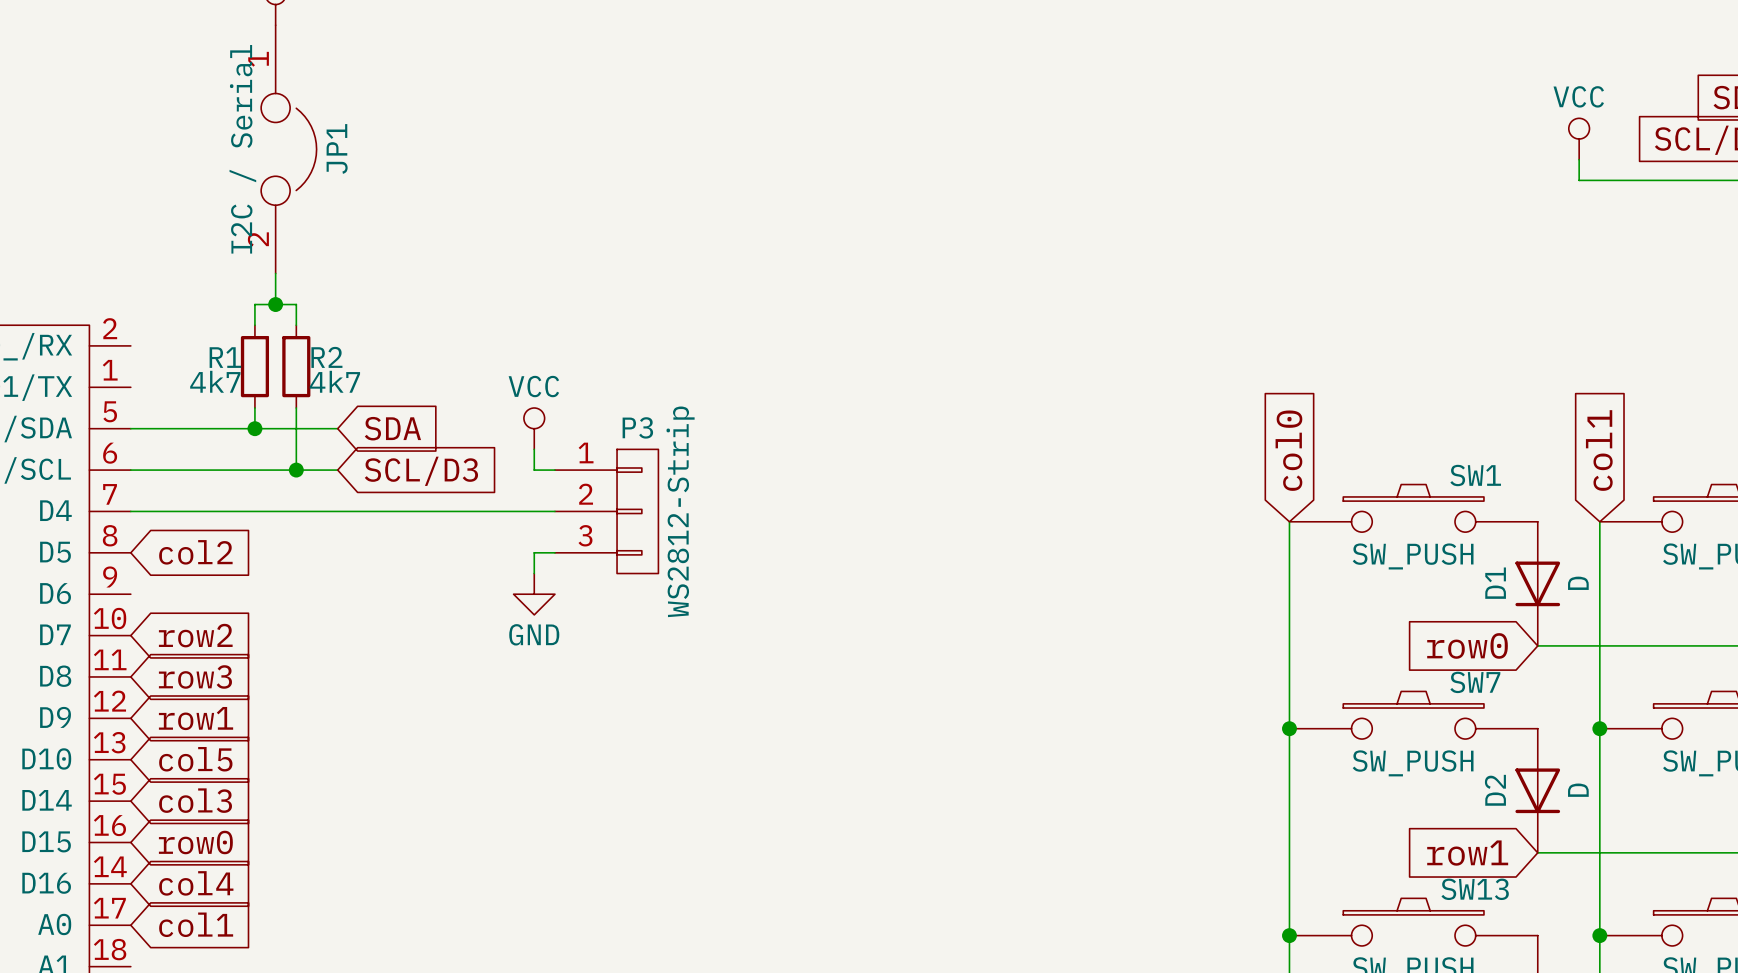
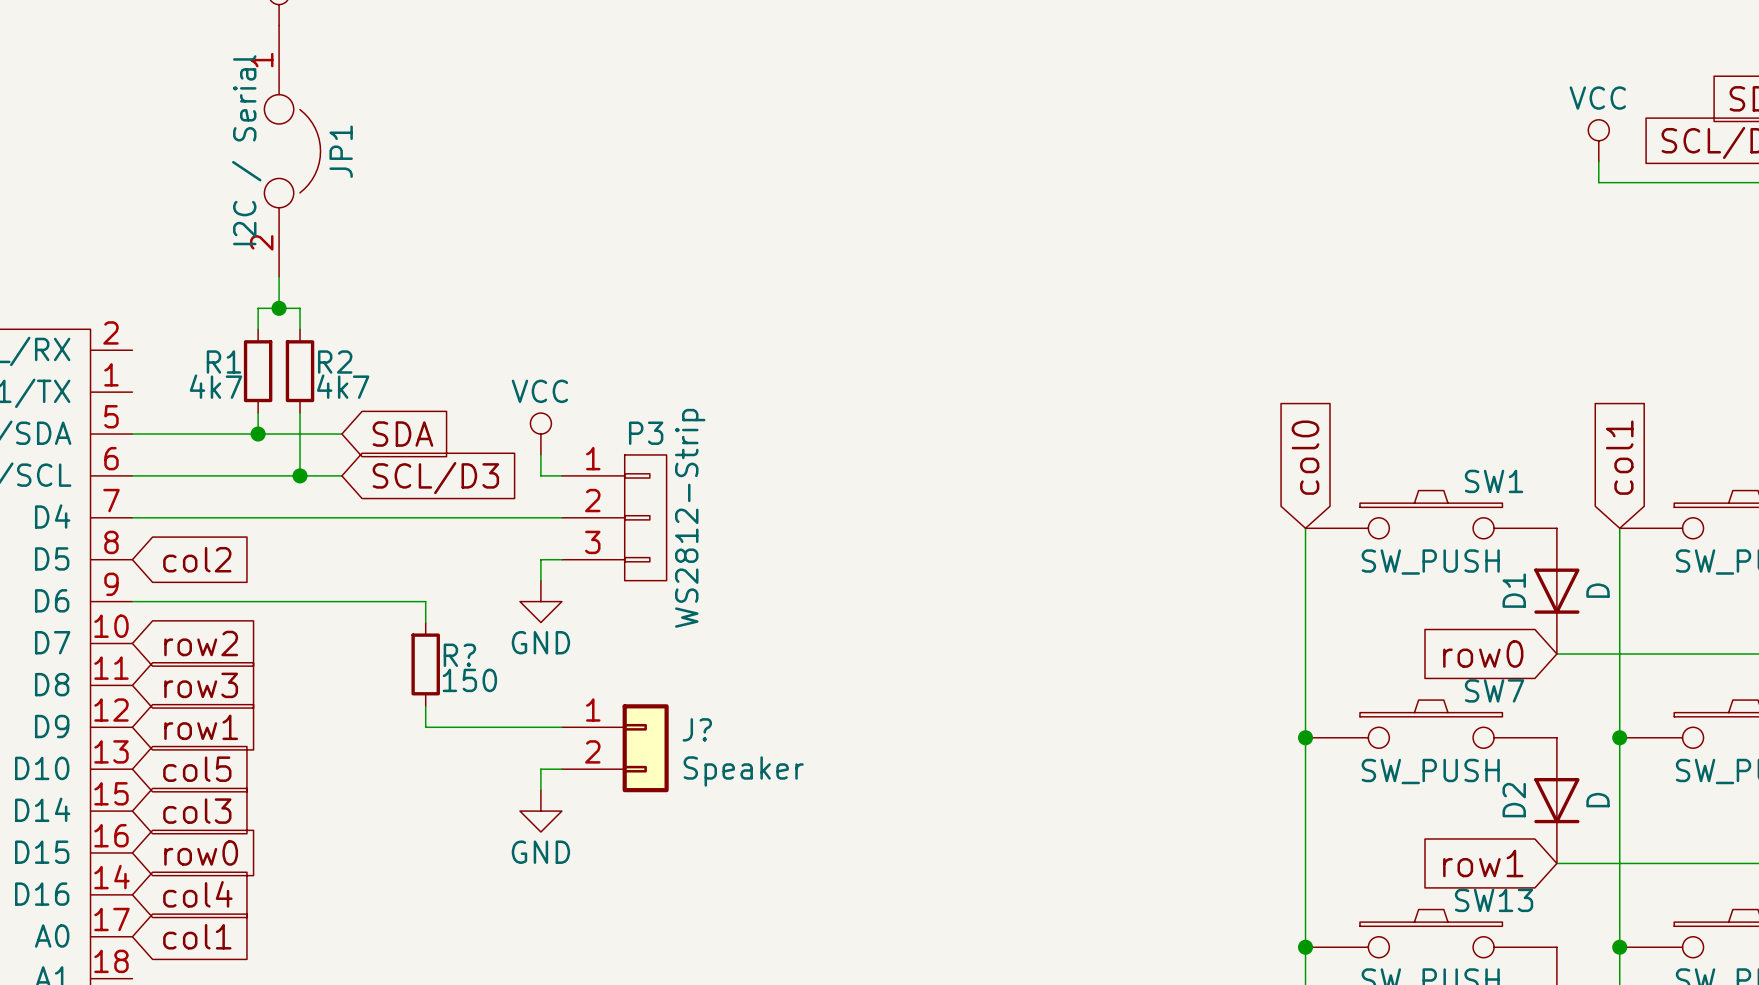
wire: none -> (132, 601) (425, 601) (425, 622)
R?: none -> 150 (425, 664)
wire: none -> (425, 706) (425, 727) (561, 727)
J?: none -> Speaker (615, 748)
wire: none -> (561, 769) (540, 769) (540, 790)
power symbol: none -> GND (540, 811)

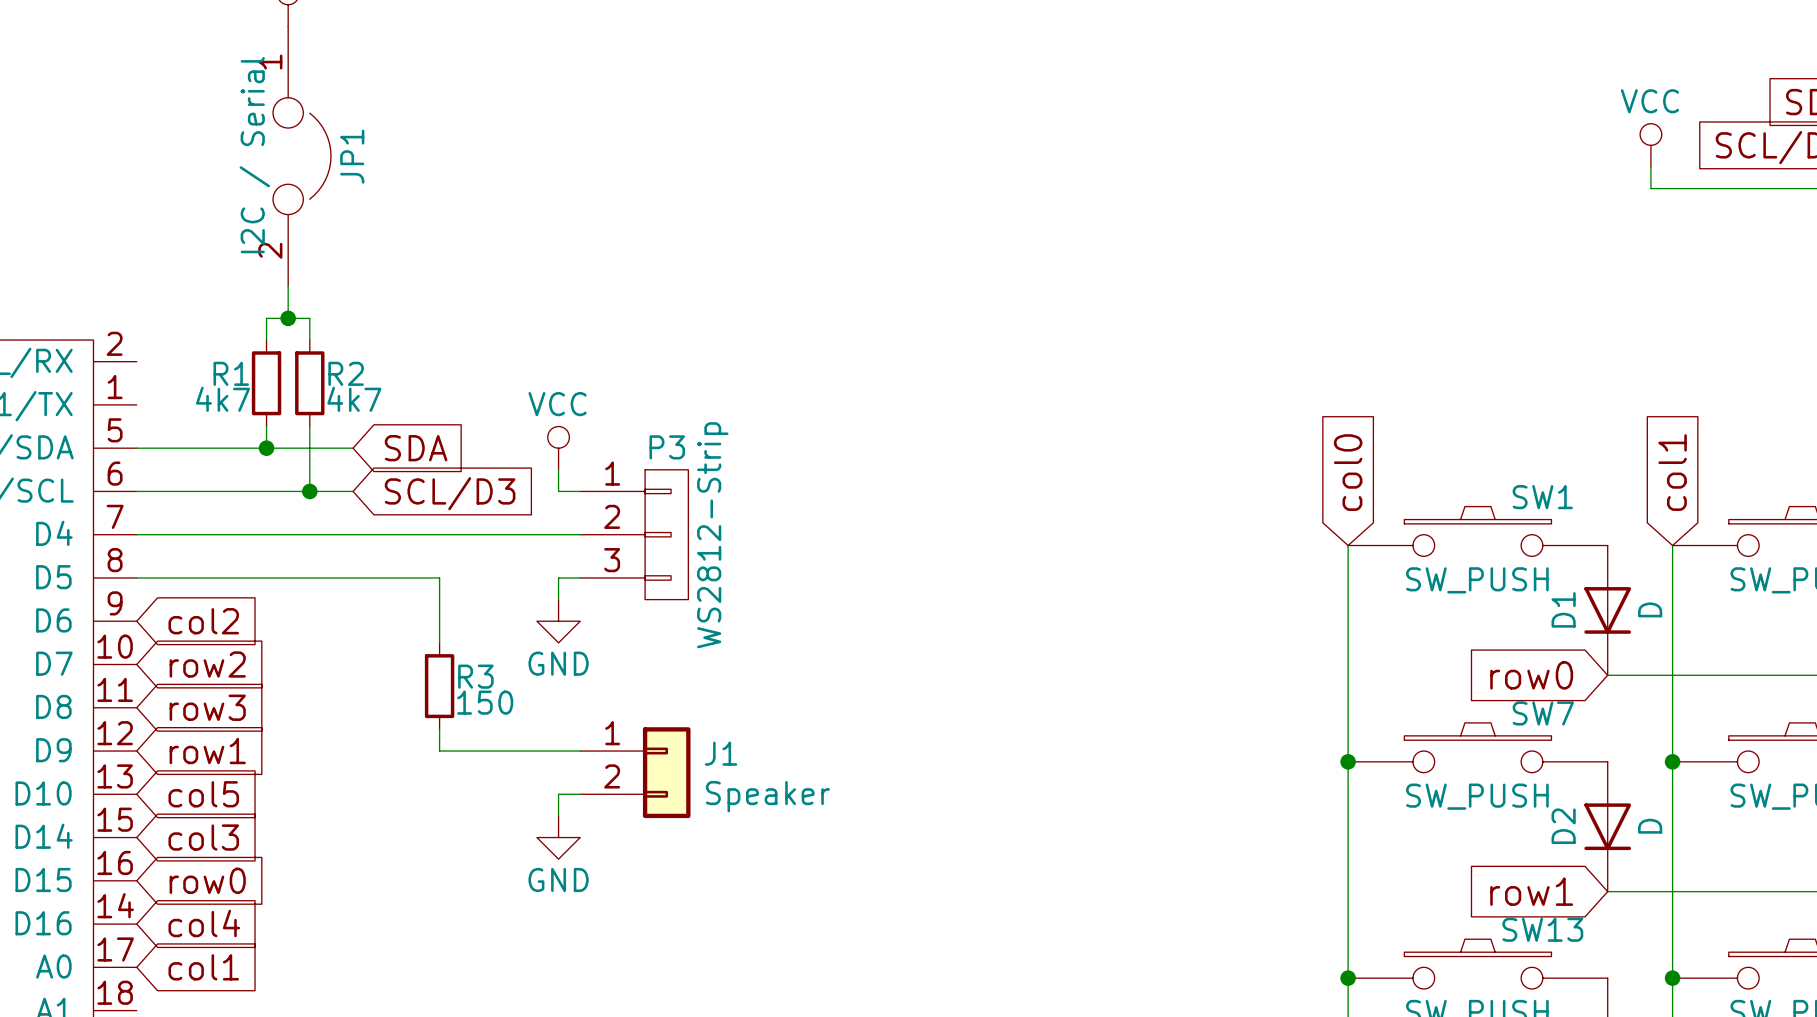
global label position: col2 (197, 559) -> col2 (203, 621)
wire: (132, 601) (425, 601) -> (136, 577) (439, 577) (439, 621)
R? name: R? (459, 655) -> R3 (475, 676)
J? name: J? (697, 729) -> J1 (721, 753)

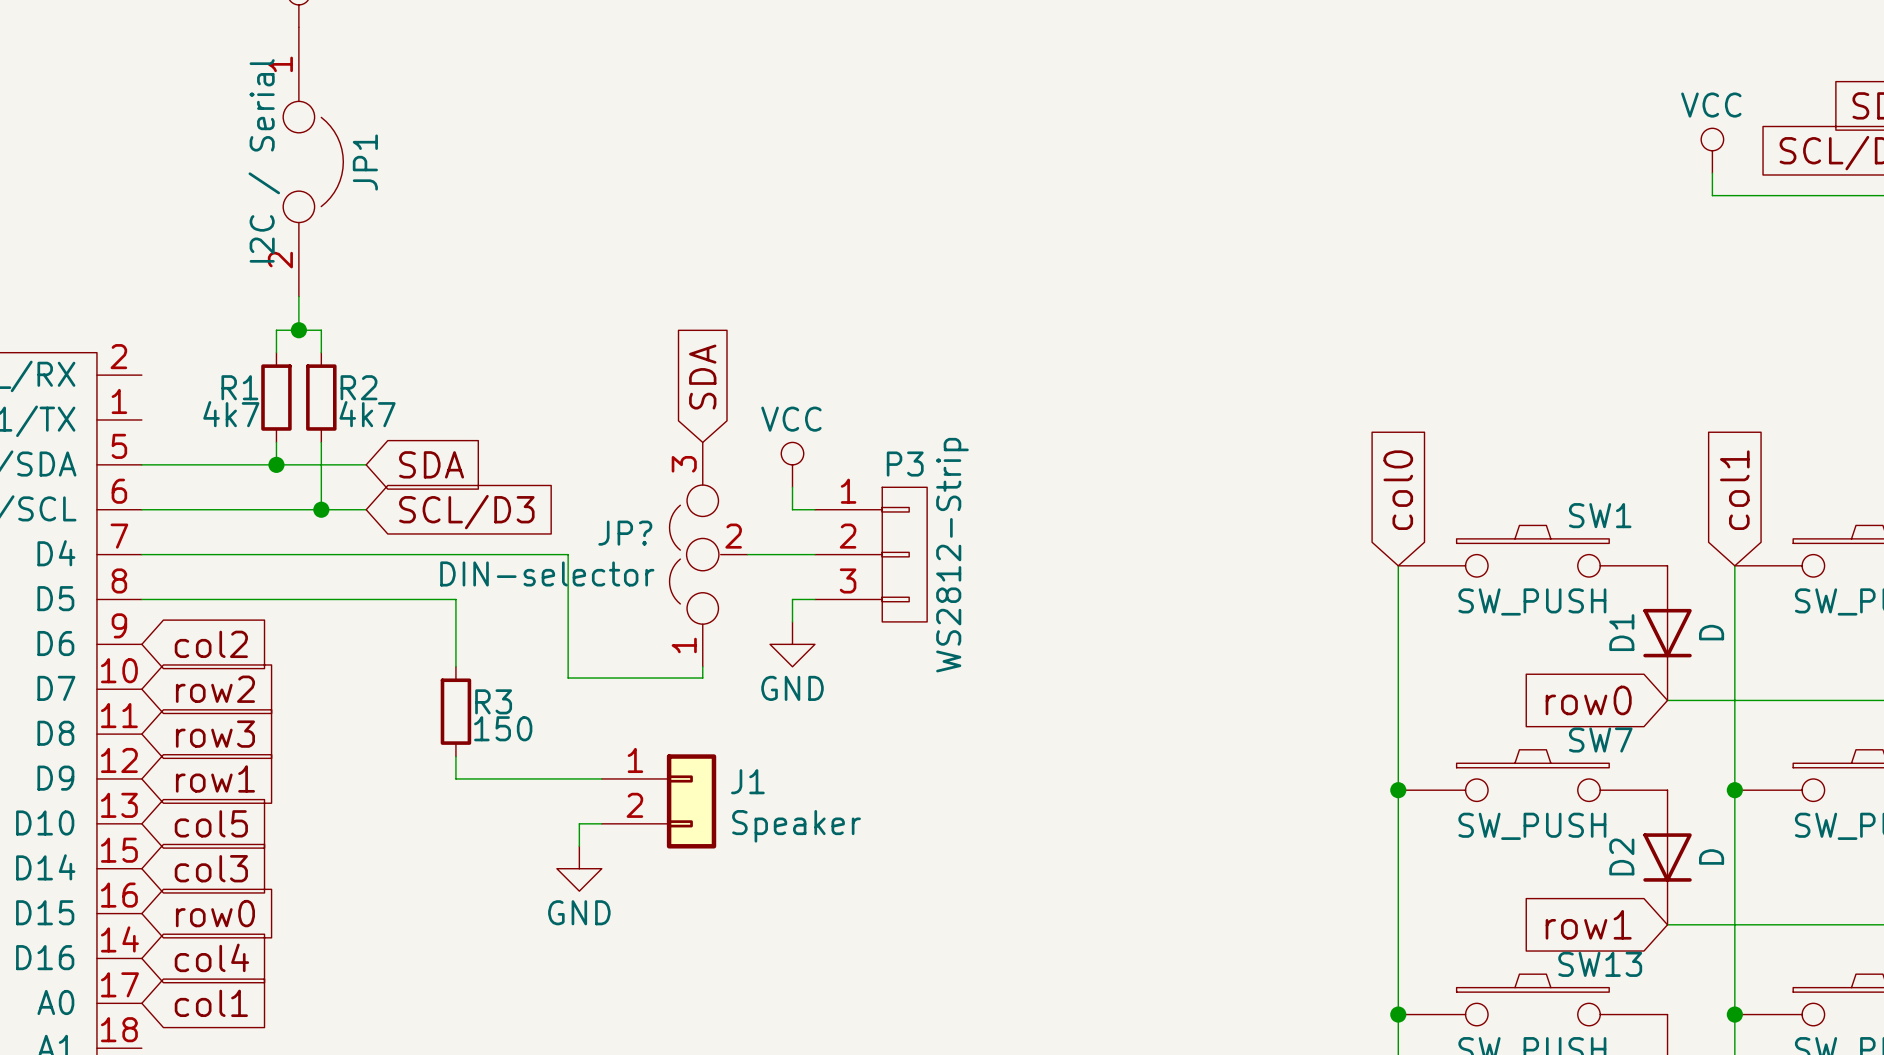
global label: none -> SDA (702, 377)
power symbol position: VCC (558, 448) -> VCC (792, 464)
wire: (558, 469) (558, 491) (580, 491) -> (792, 487) (792, 509) (814, 509)
wire: (547, 534) (580, 534) -> (568, 554) (568, 678) (702, 678) (702, 666)
P3 position: (634, 534) -> (871, 554)
JP?: none -> DIN-selector (708, 554)
wire: none -> (747, 554) (814, 554)
wire: (580, 577) (558, 577) (558, 599) -> (814, 599) (792, 599) (792, 621)
power symbol position: GND (558, 621) -> GND (792, 644)

